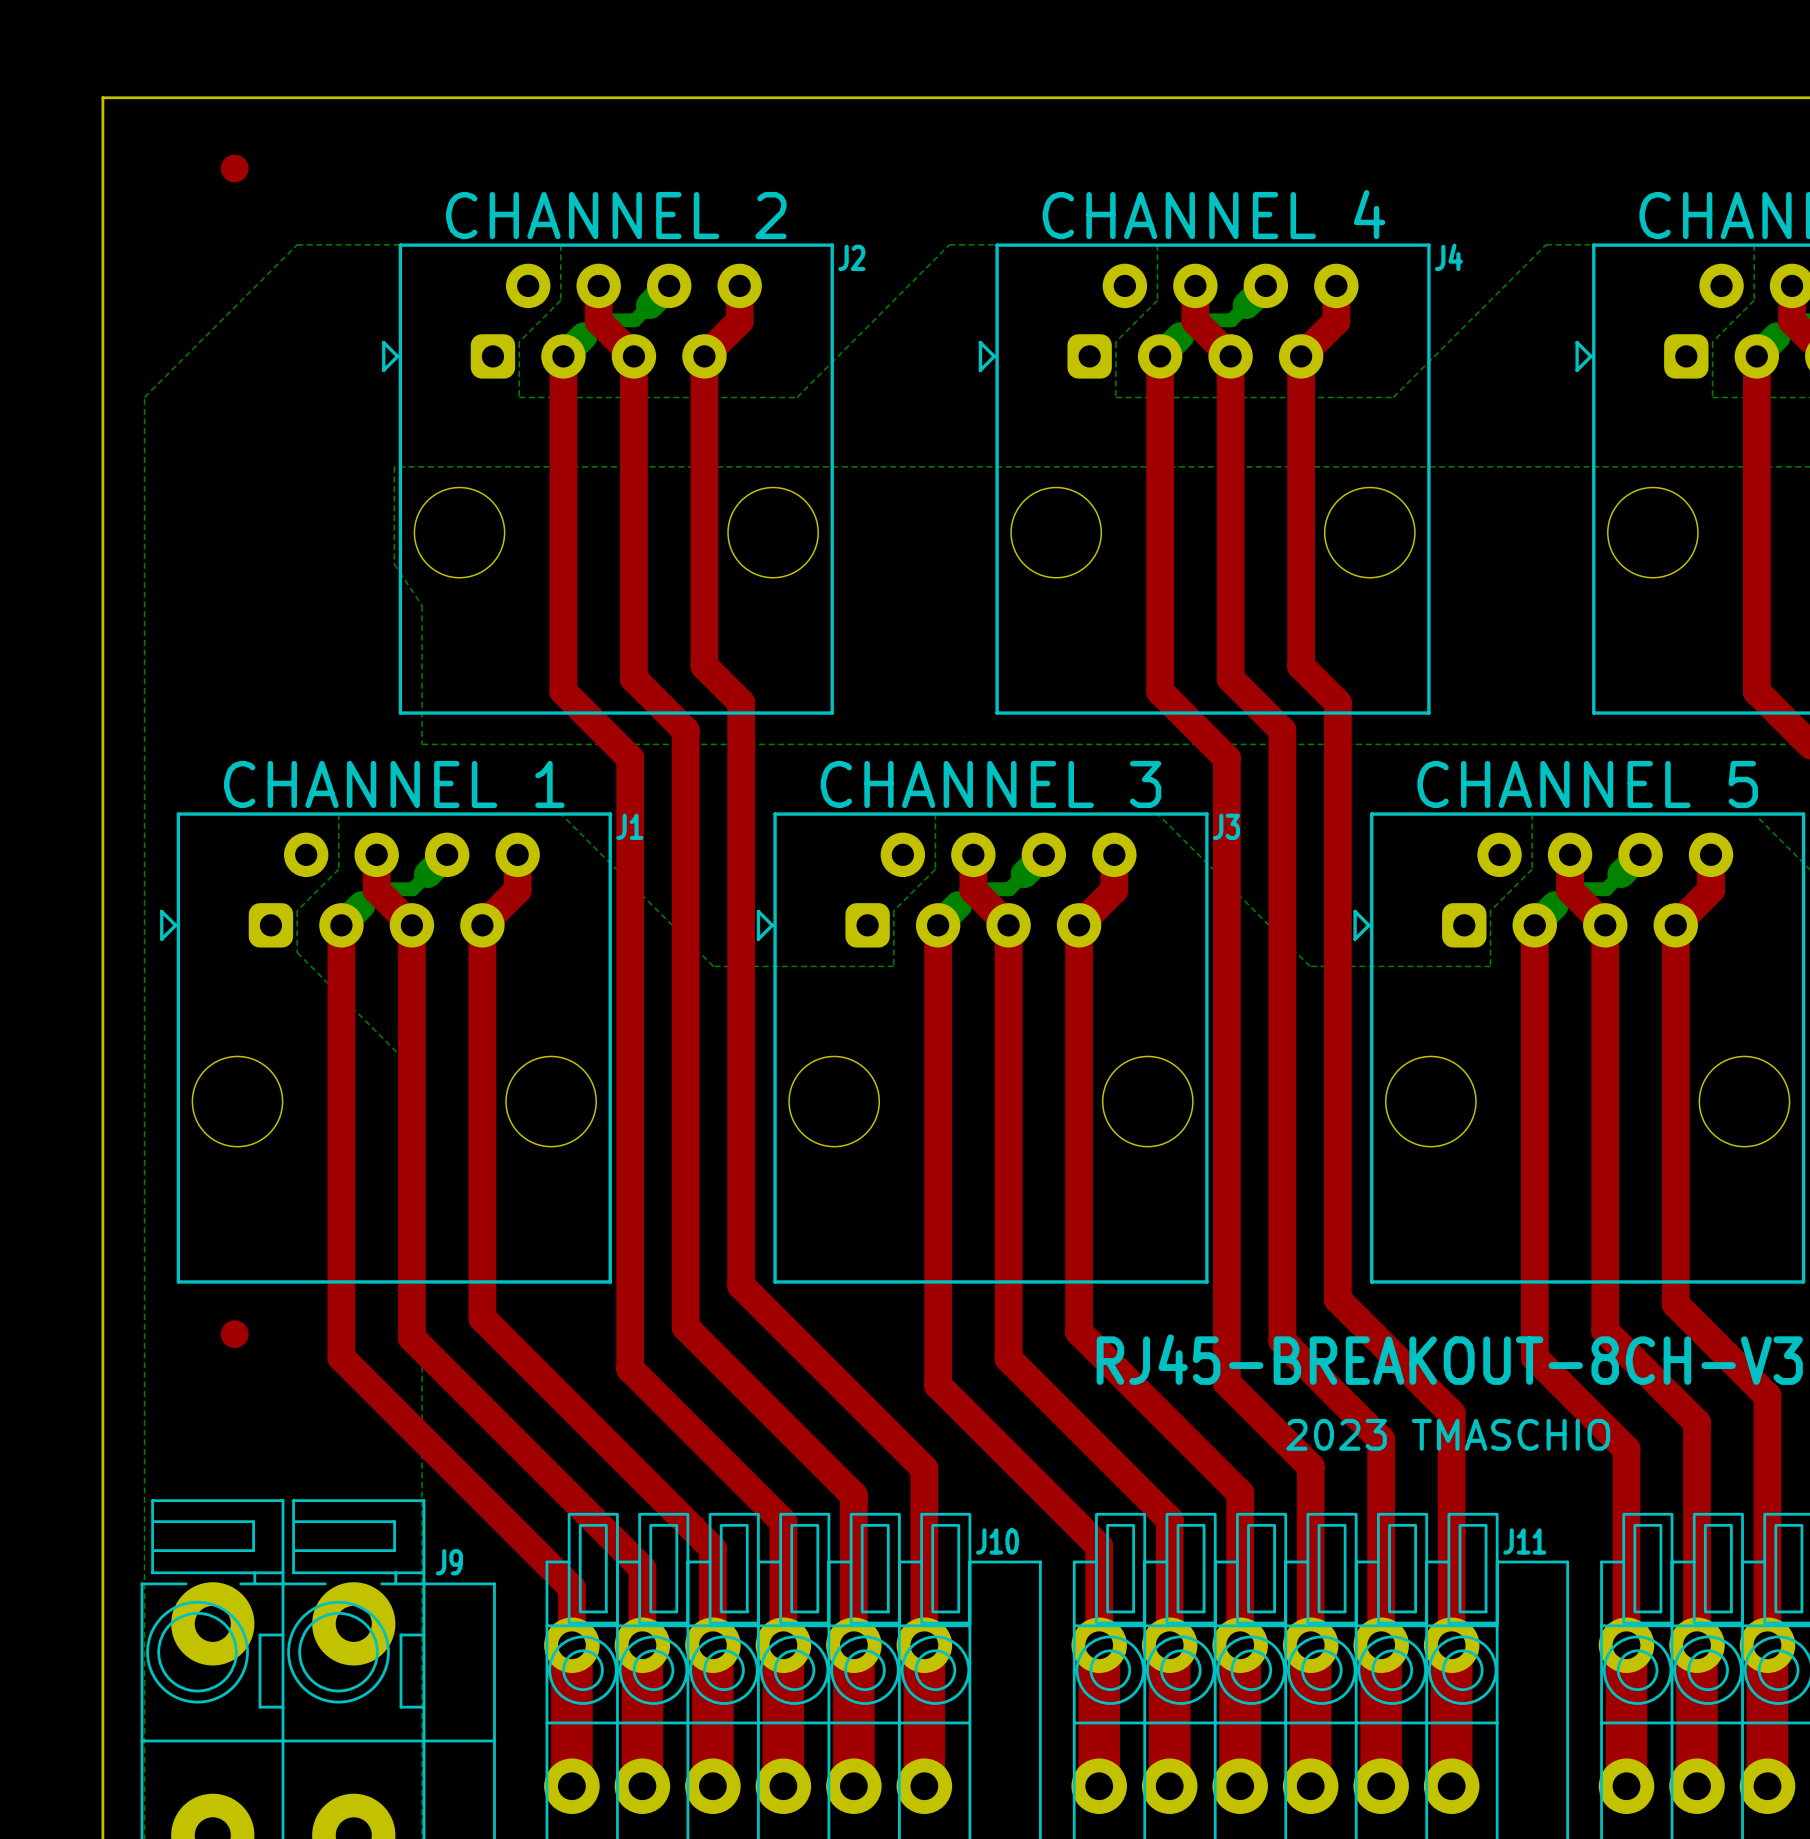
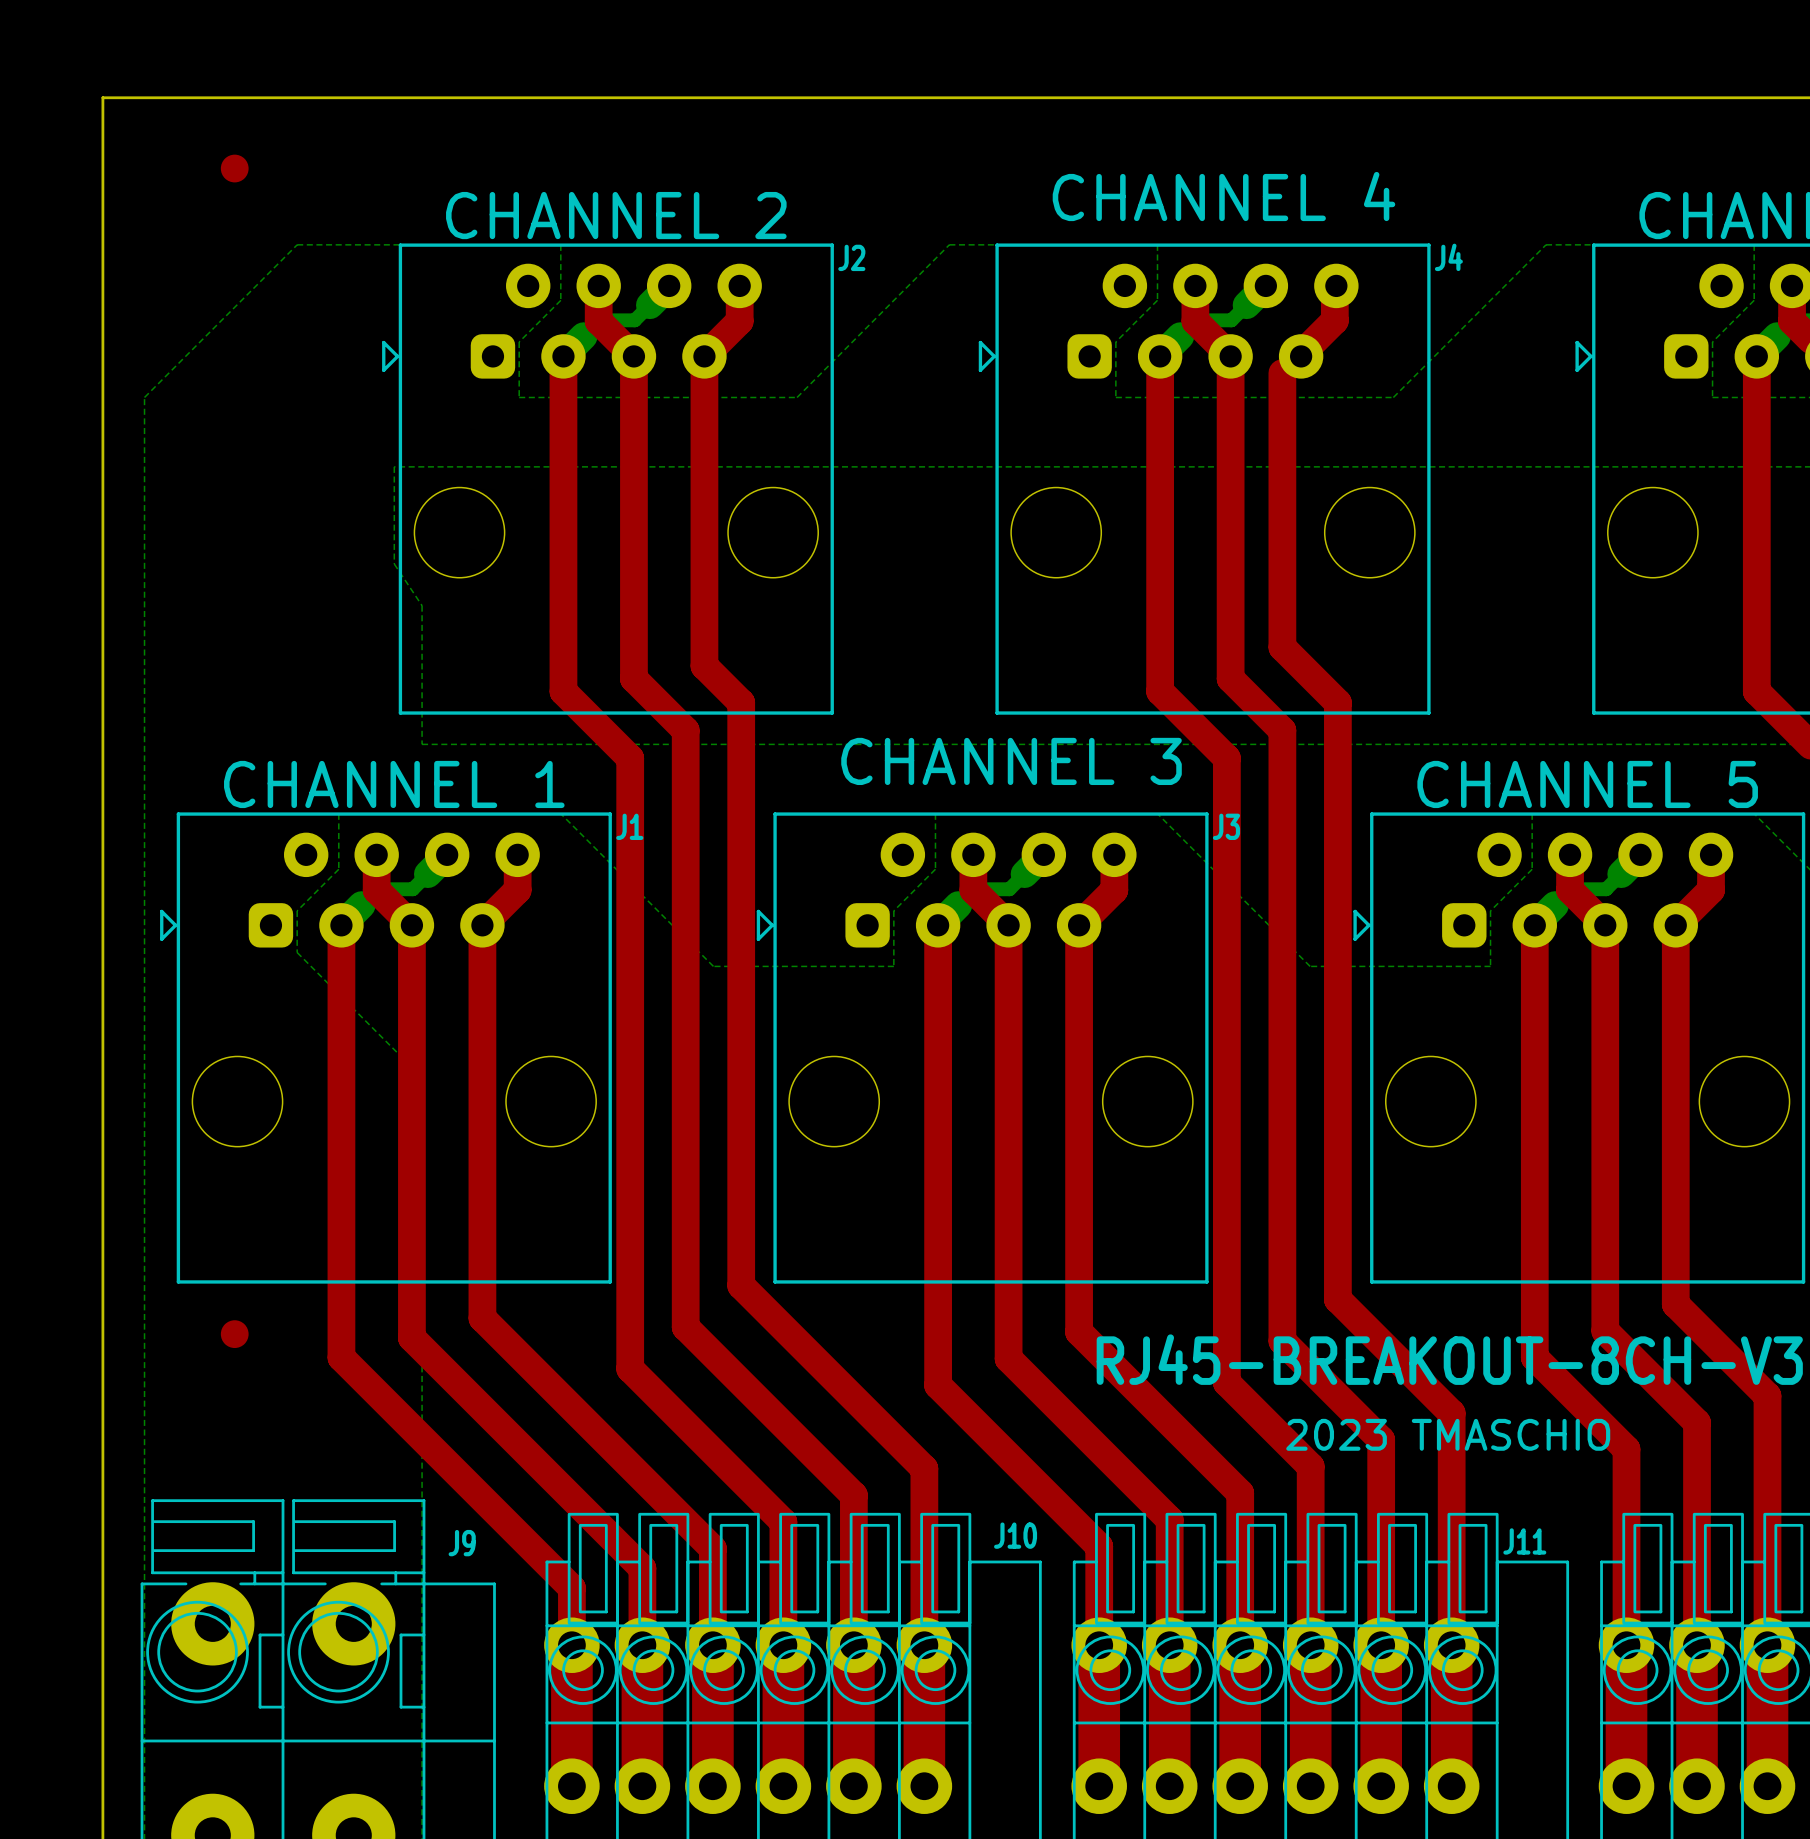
text position: CHANNEL 4 (1213, 214) -> CHANNEL 4 (1223, 196)
top track: (1336, 285) (1336, 321) (1301, 356) (1301, 665) -> (1334, 285) (1334, 320) (1282, 373) (1282, 647) (1301, 665)
text position: CHANNEL 3 (990, 784) -> CHANNEL 3 (1011, 761)
J10 name position: J10 (997, 1541) -> J10 (1015, 1535)
J9 name position: J9 (449, 1562) -> J9 (462, 1543)

